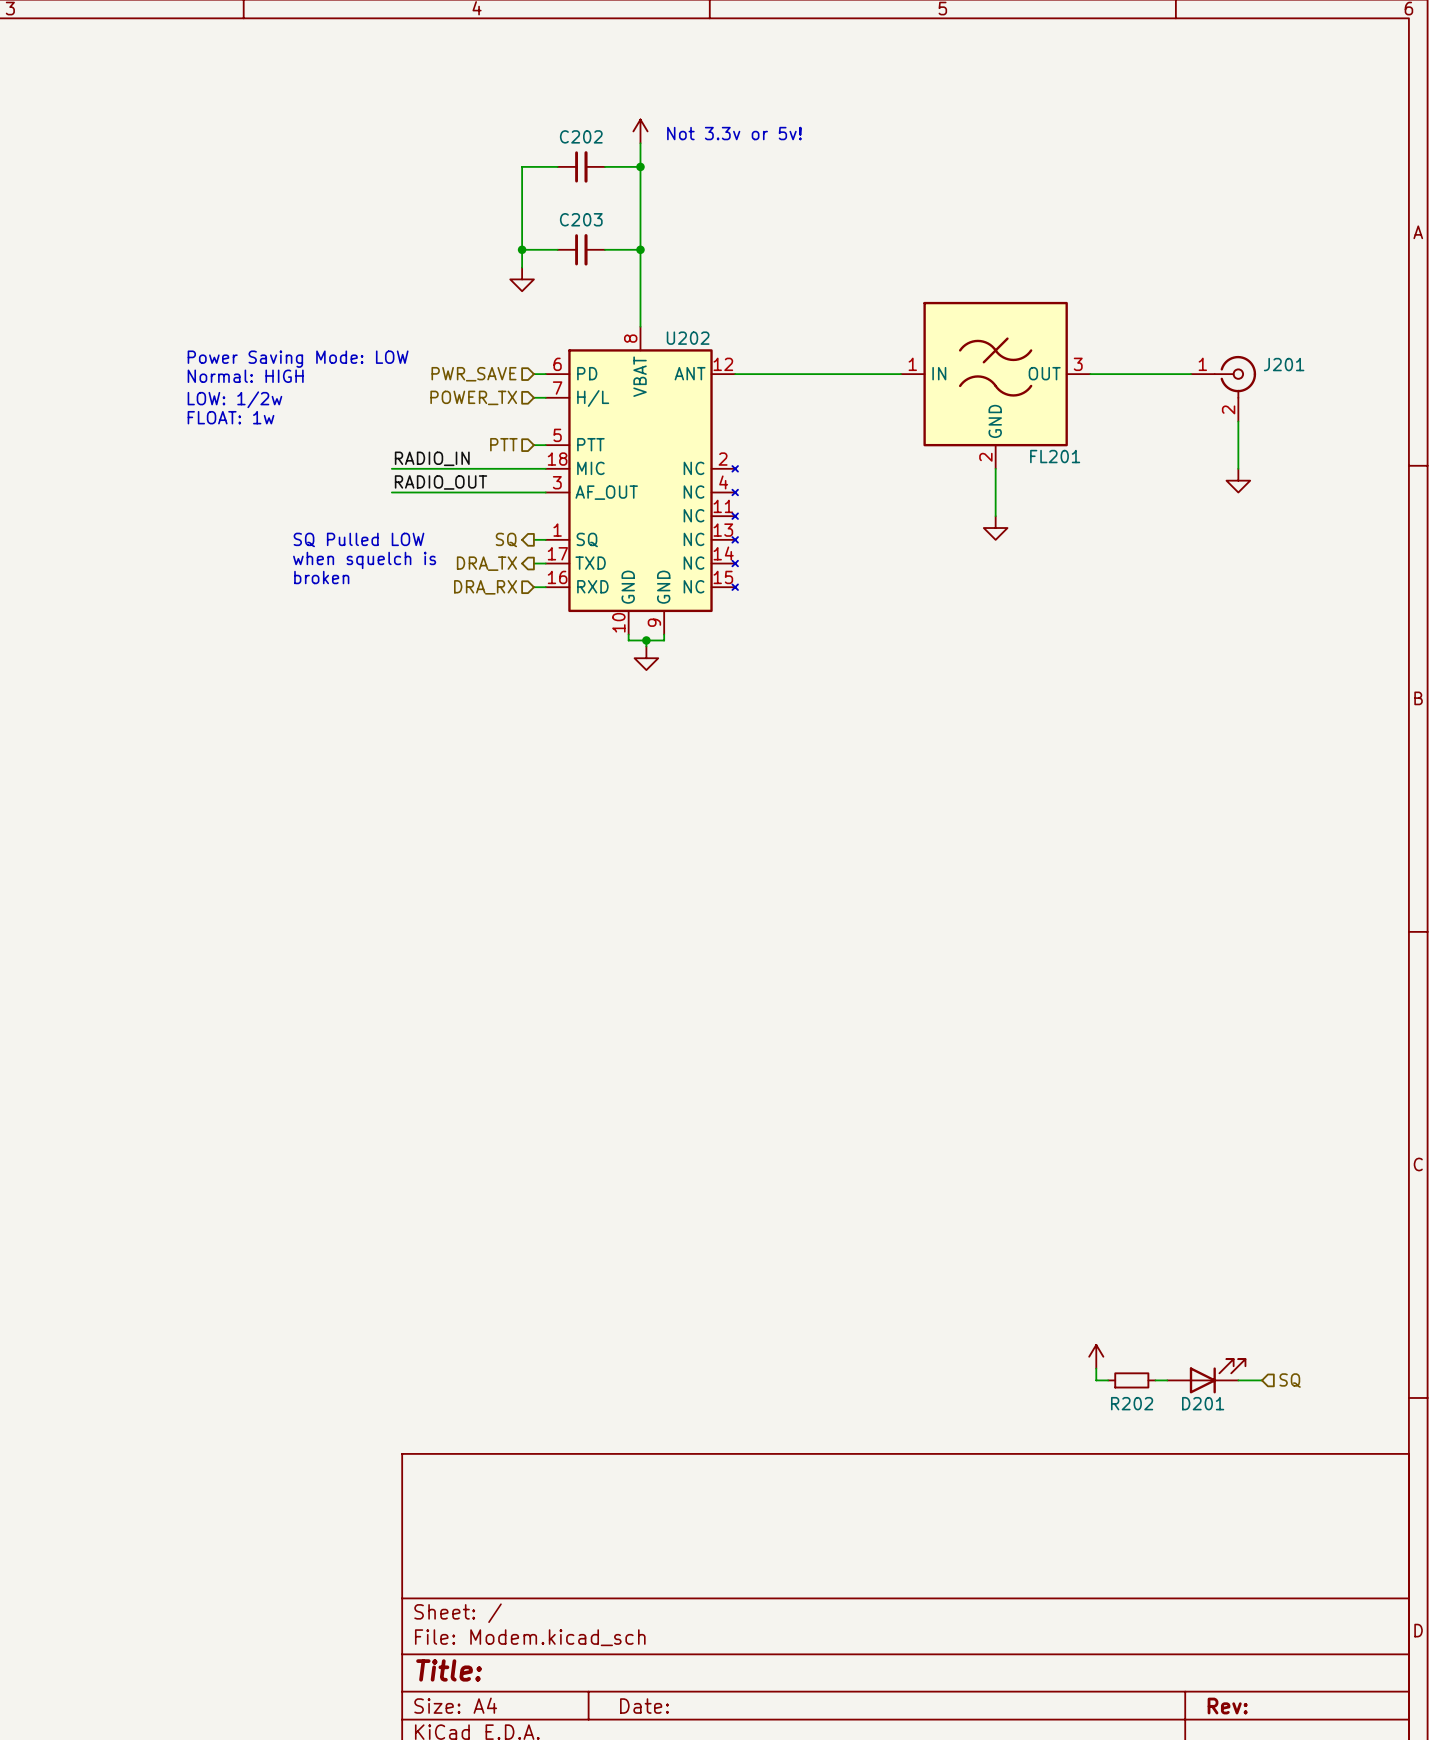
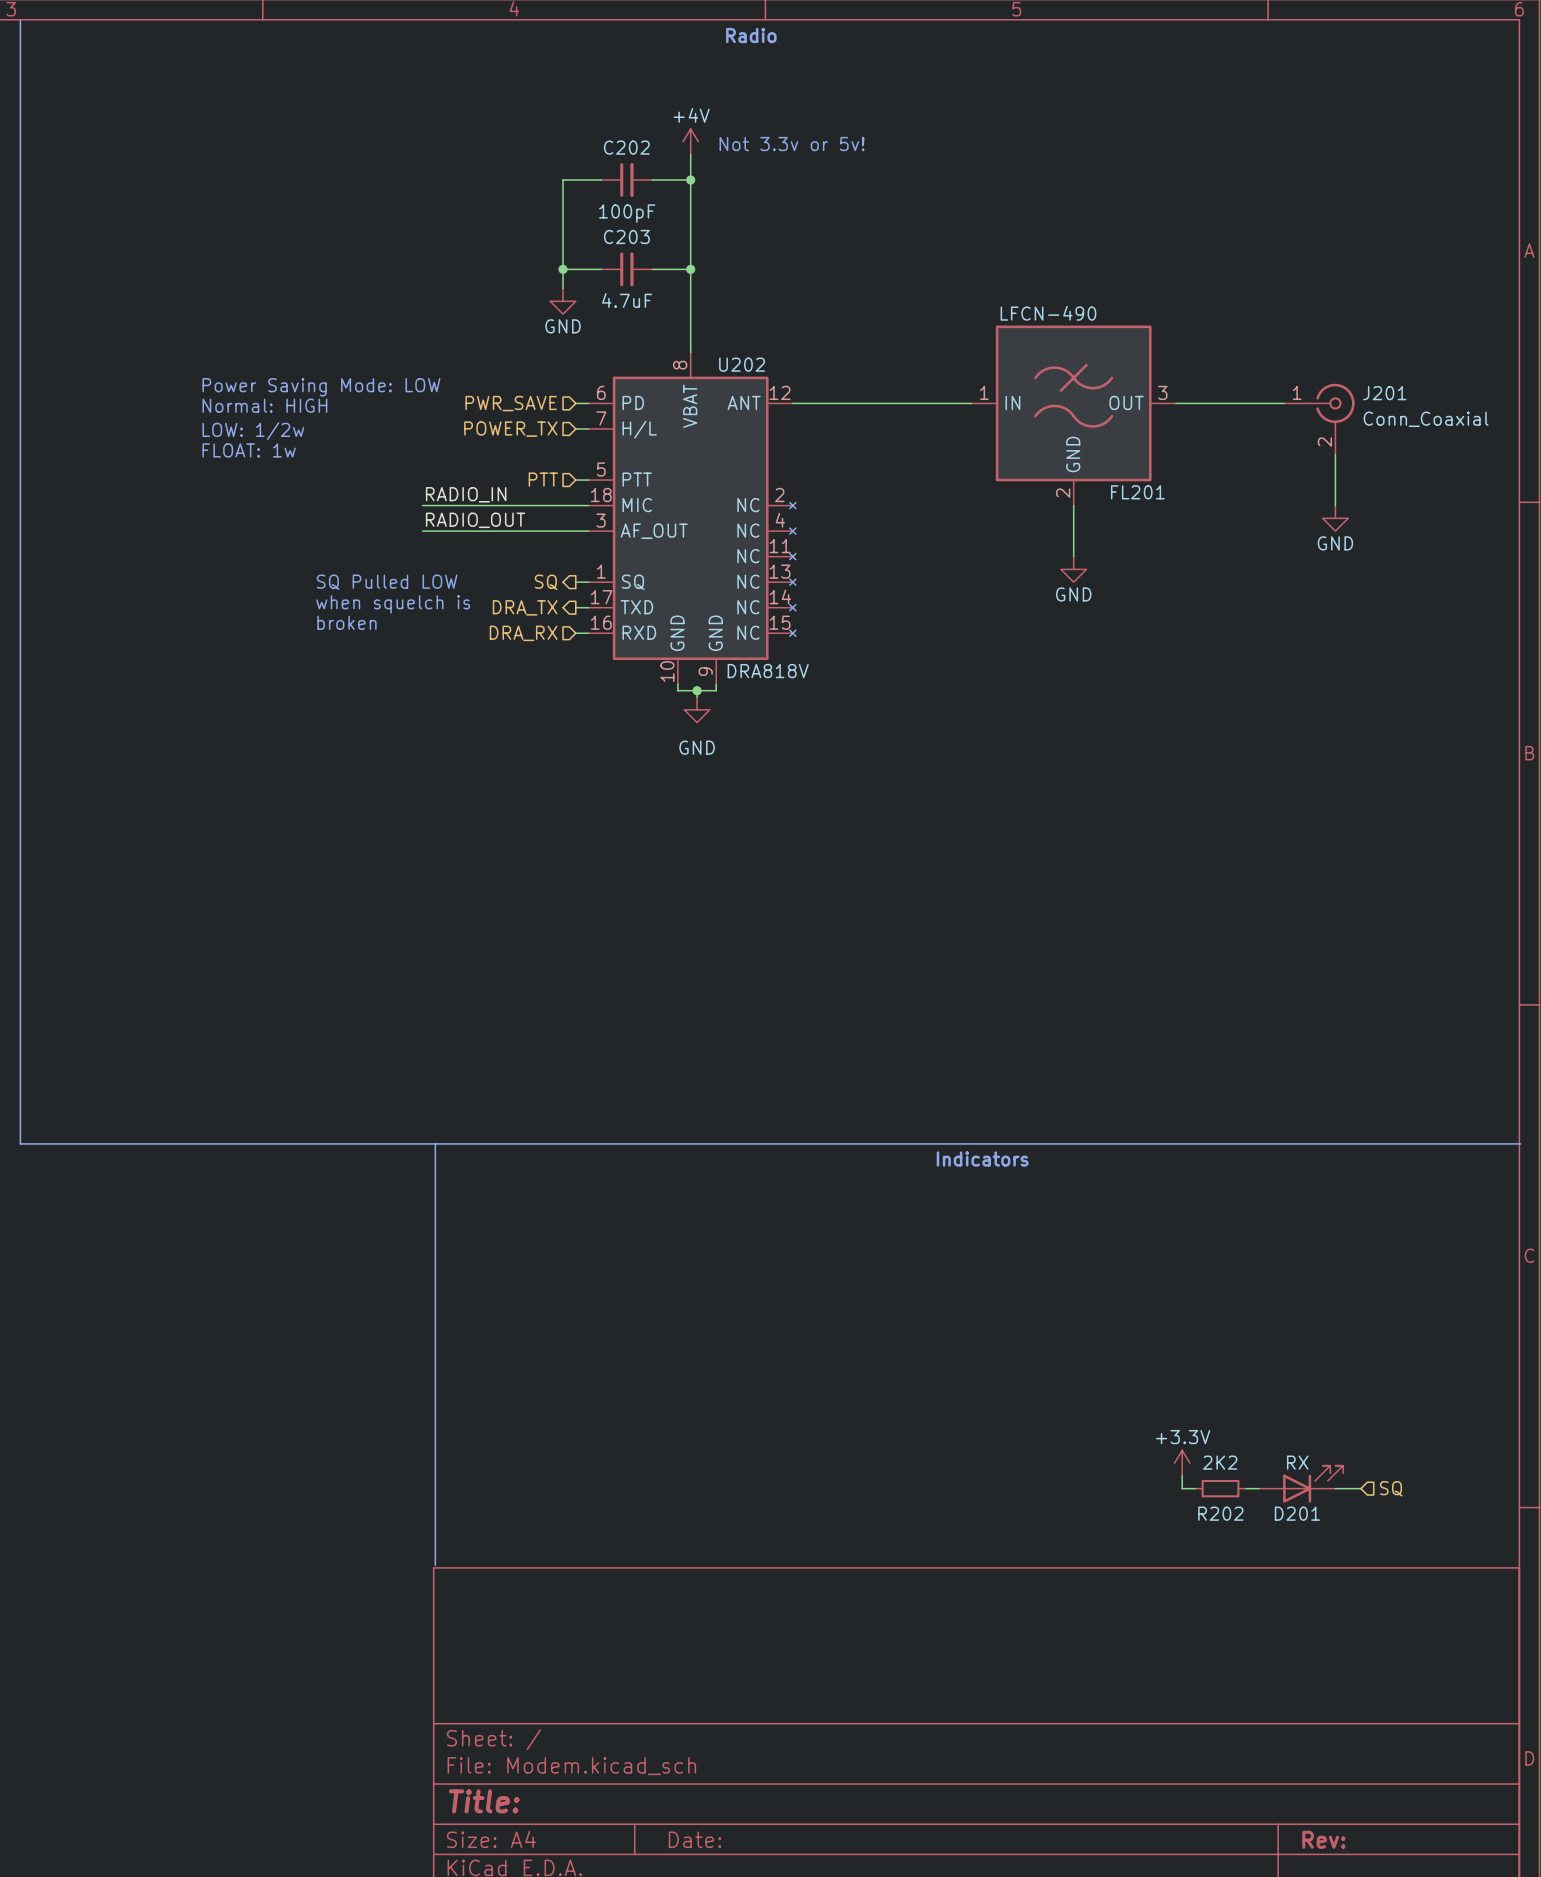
line: none -> (20, 20) (20, 1143) (1520, 1143)
text: none -> Radio (751, 35)
power symbol text: none -> +4V (691, 115)
C202 value: none -> 100pF (627, 213)
C203 value: none -> 4.7uF (627, 300)
FL201 value: none -> LFCN-490 (1048, 313)
power symbol text: none -> GND (563, 326)
J201 value: none -> Conn_Coaxial (1426, 419)
power symbol text: none -> GND (1335, 543)
power symbol text: none -> GND (1073, 594)
U202 value: none -> DRA818V (768, 671)
power symbol text: none -> GND (697, 747)
line: none -> (435, 1143) (435, 1565)
text: none -> Indicators (982, 1159)
power symbol text: none -> +3.3V (1183, 1437)
R202 value: none -> 2K2 (1220, 1462)
D201 value: none -> RX (1297, 1462)

